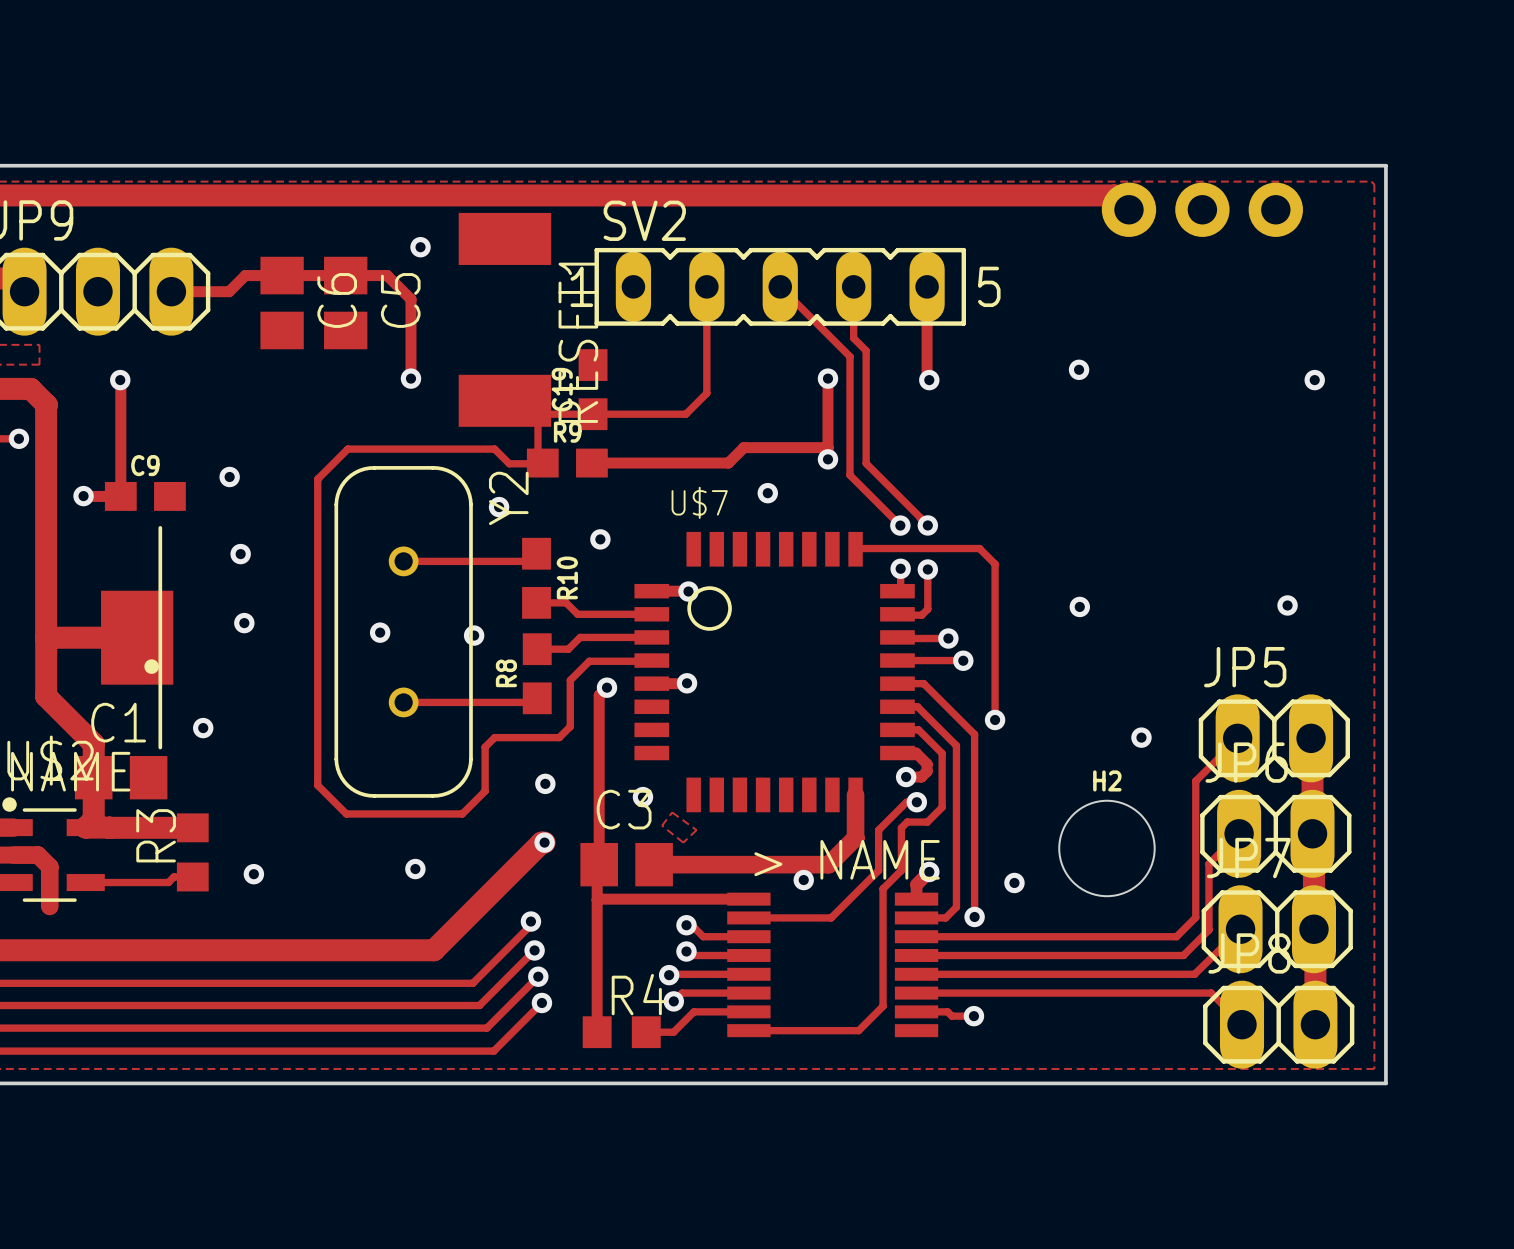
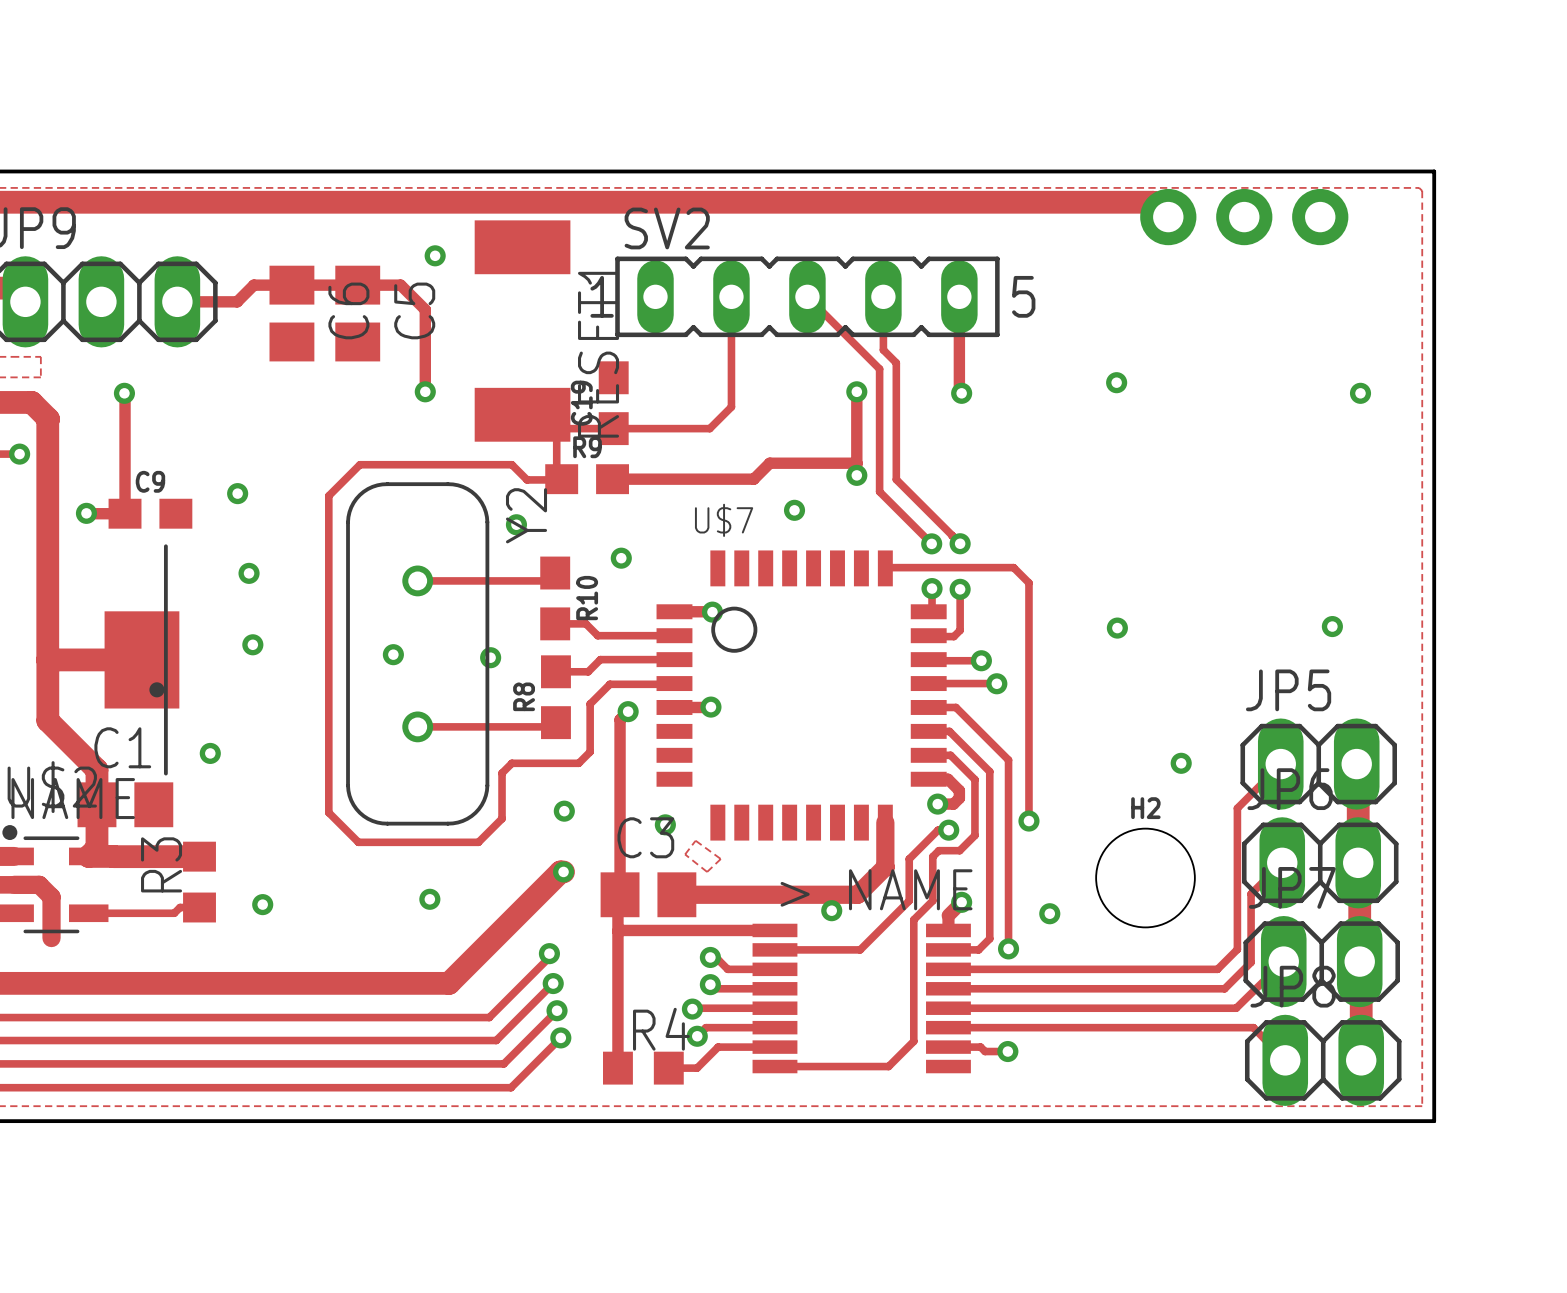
track: (994, 563) (995, 720) -> (1028, 582) (1028, 821)
via position: (995, 720) -> (1028, 821)

